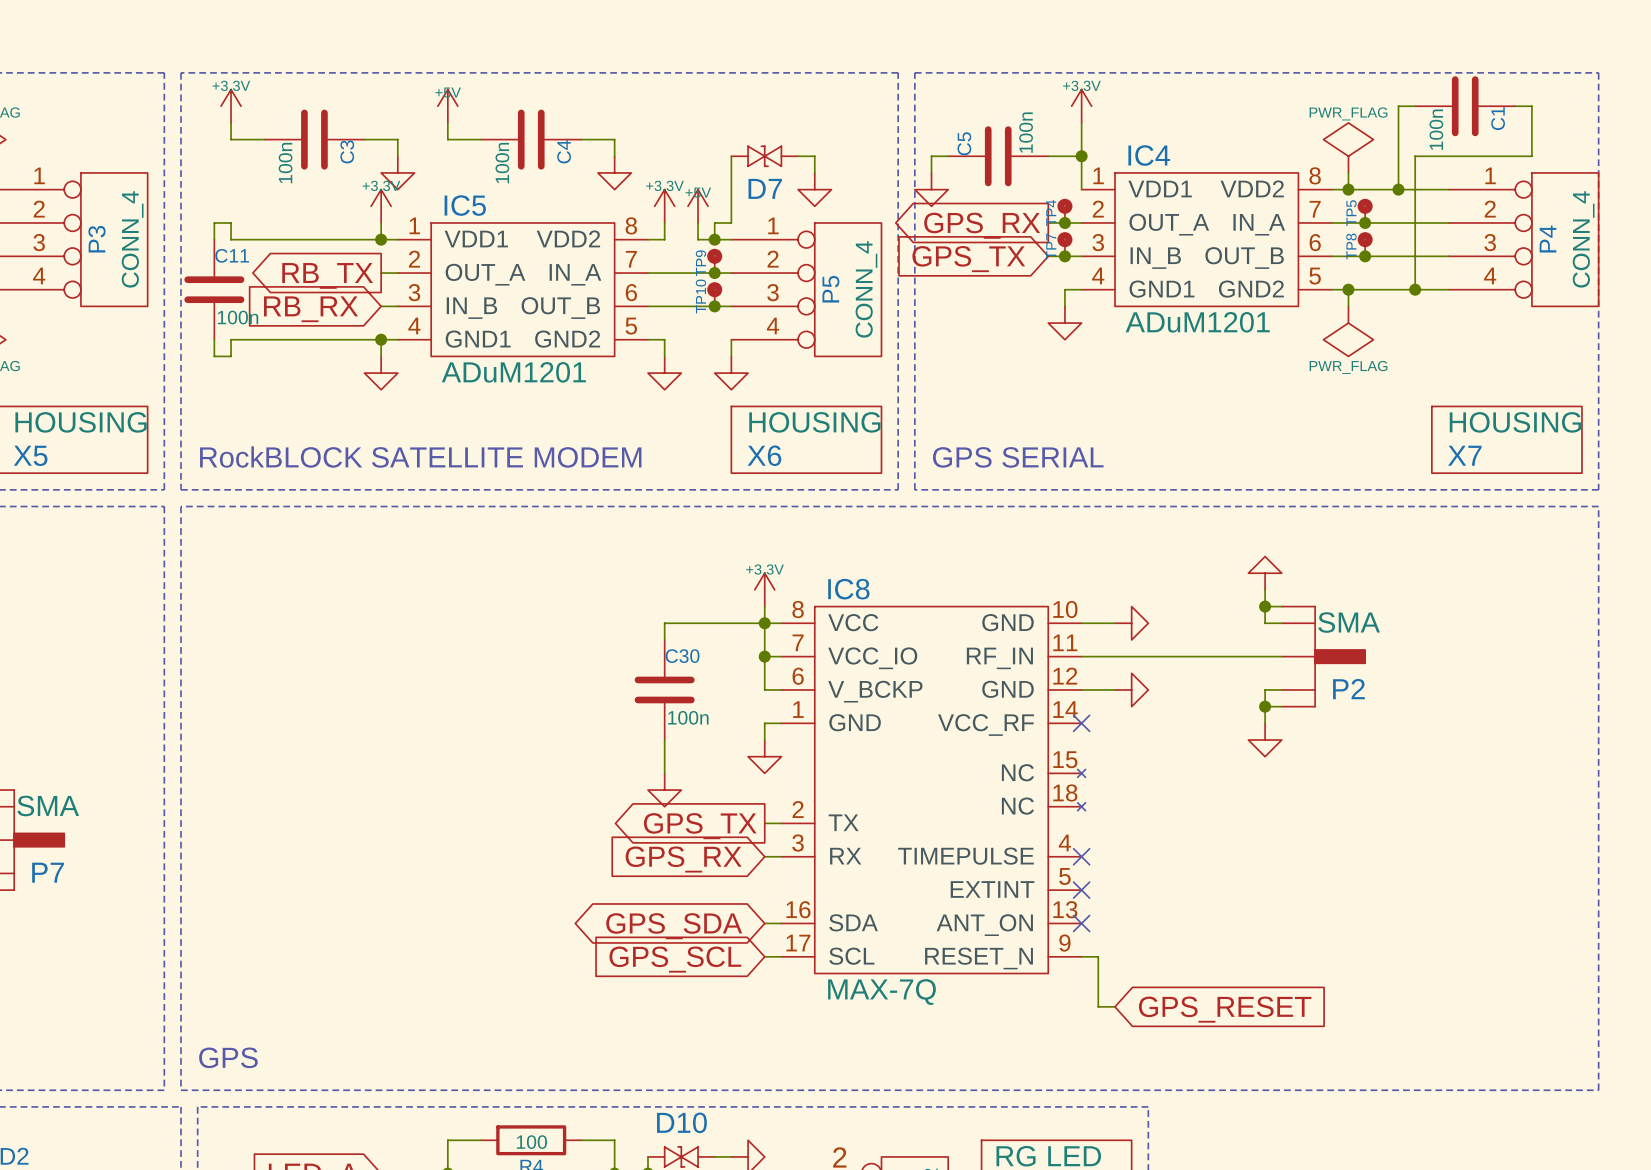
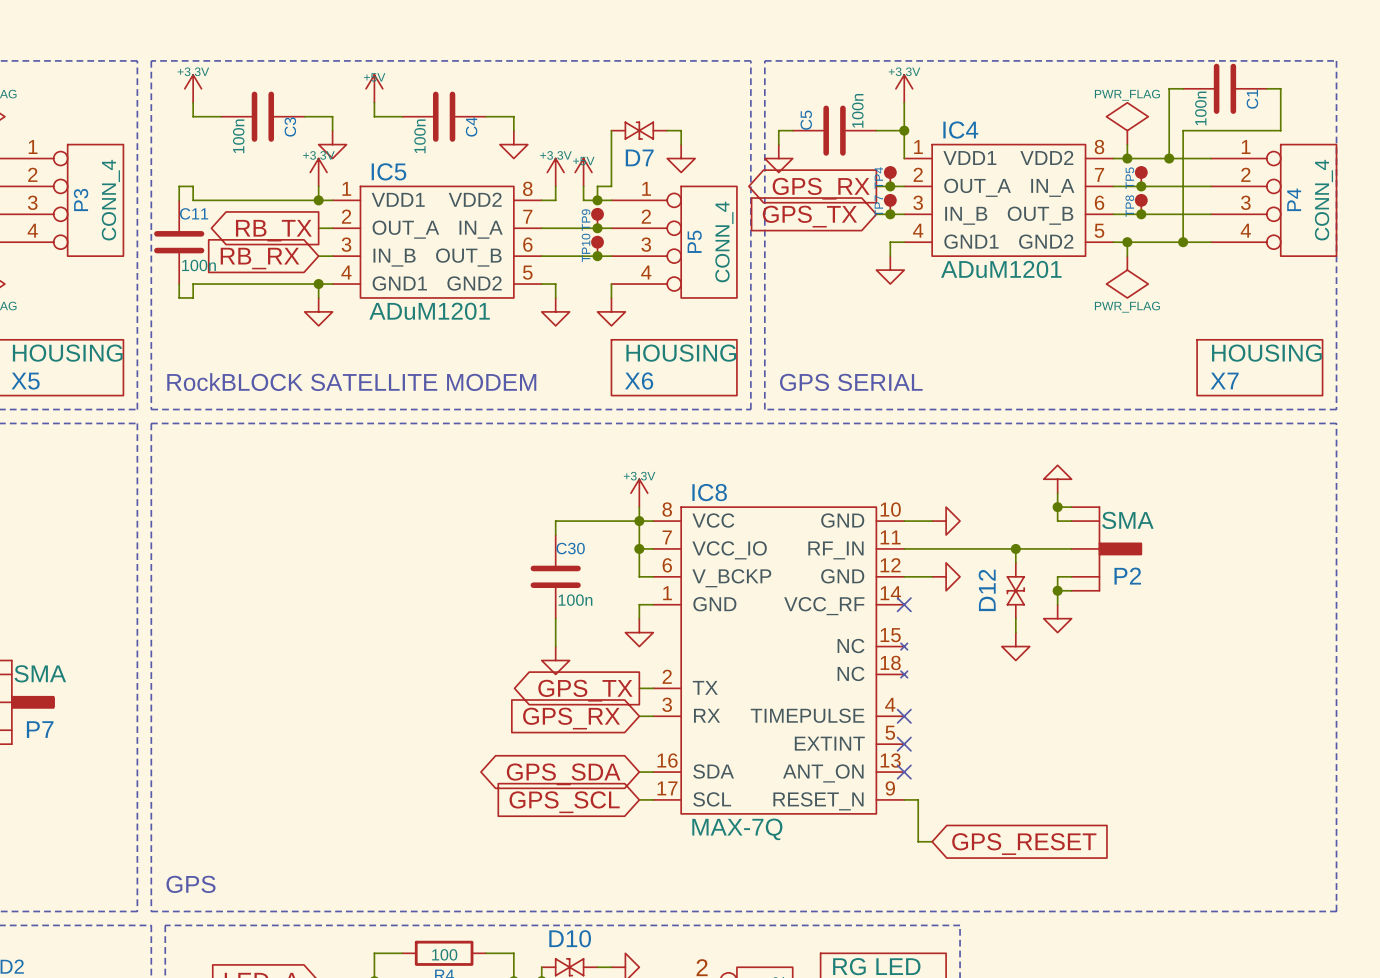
wire: none -> (1015, 548) (1015, 562)
junction: none -> (1015, 548)
D12: none -> (1015, 590)
wire: none -> (1015, 618) (1015, 632)
power symbol: none -> (1015, 646)

